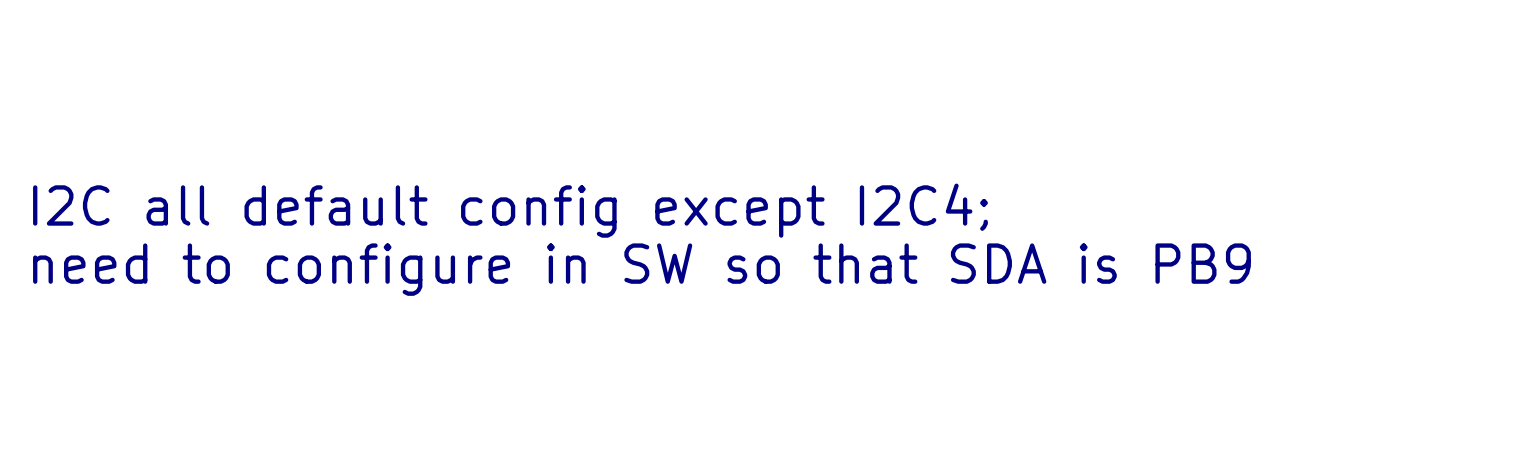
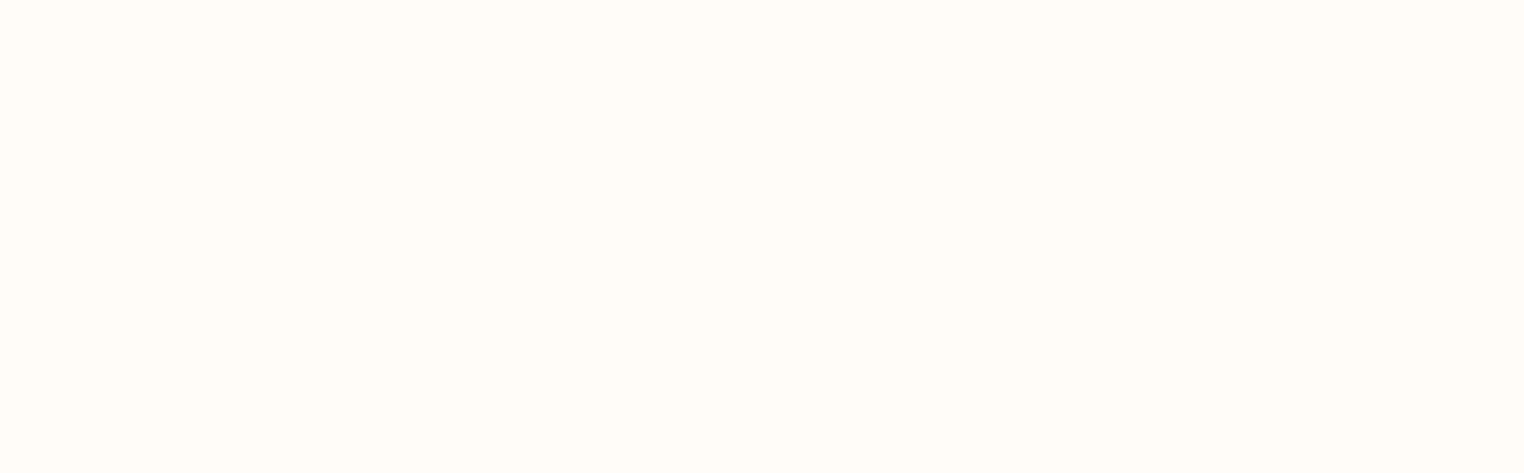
text: I2C all default config except I2C4; (510, 210) -> none
text: need to configure in SW so that SDA is PB9 (641, 269) -> none

